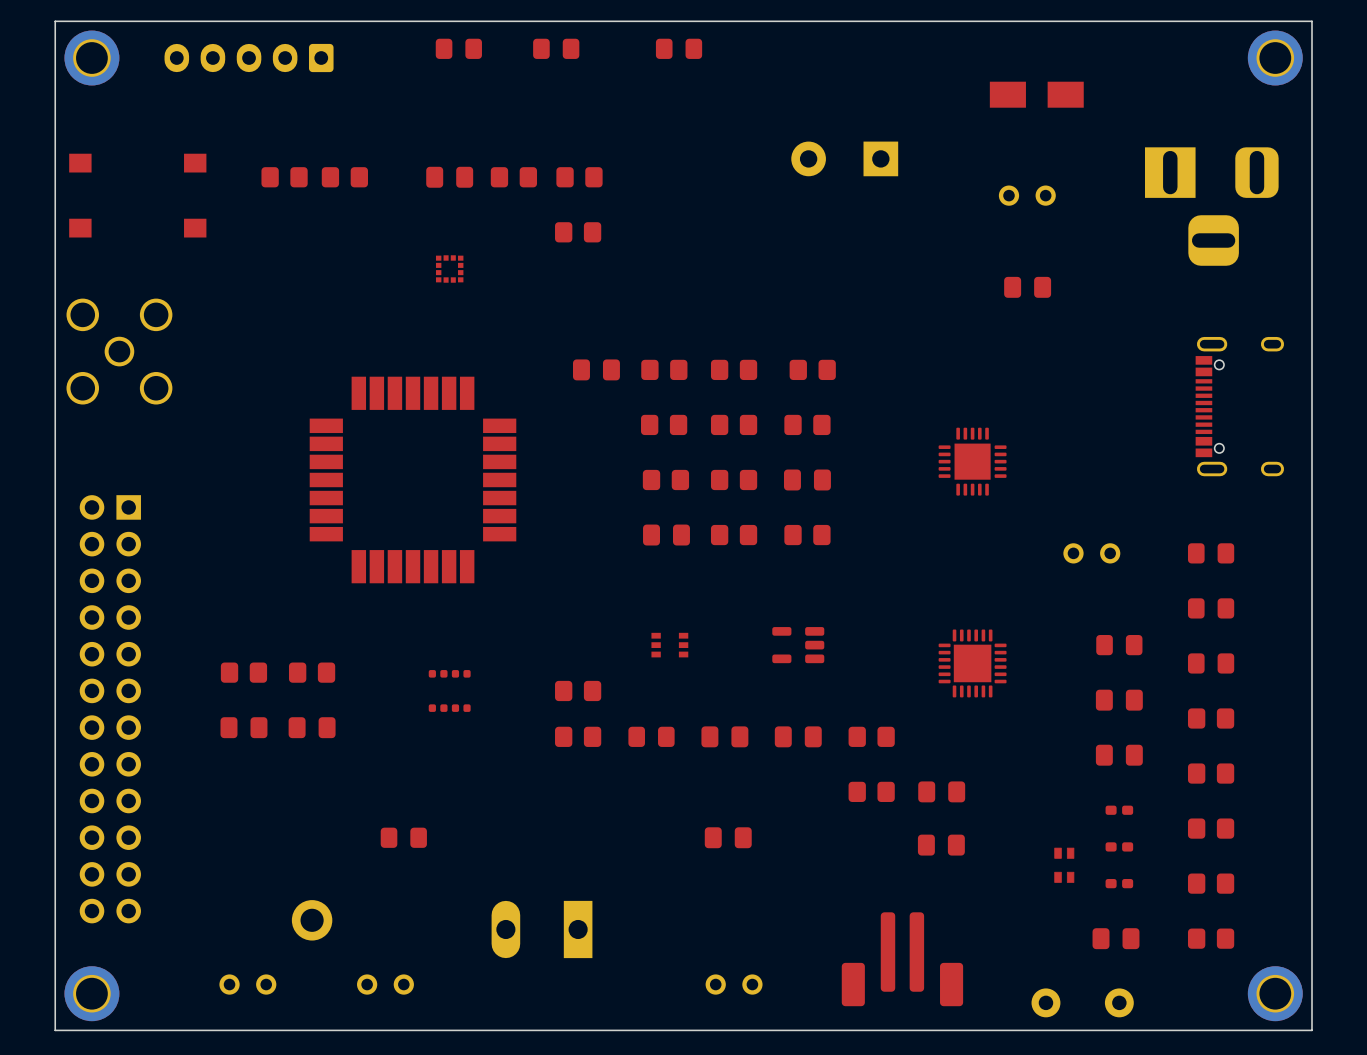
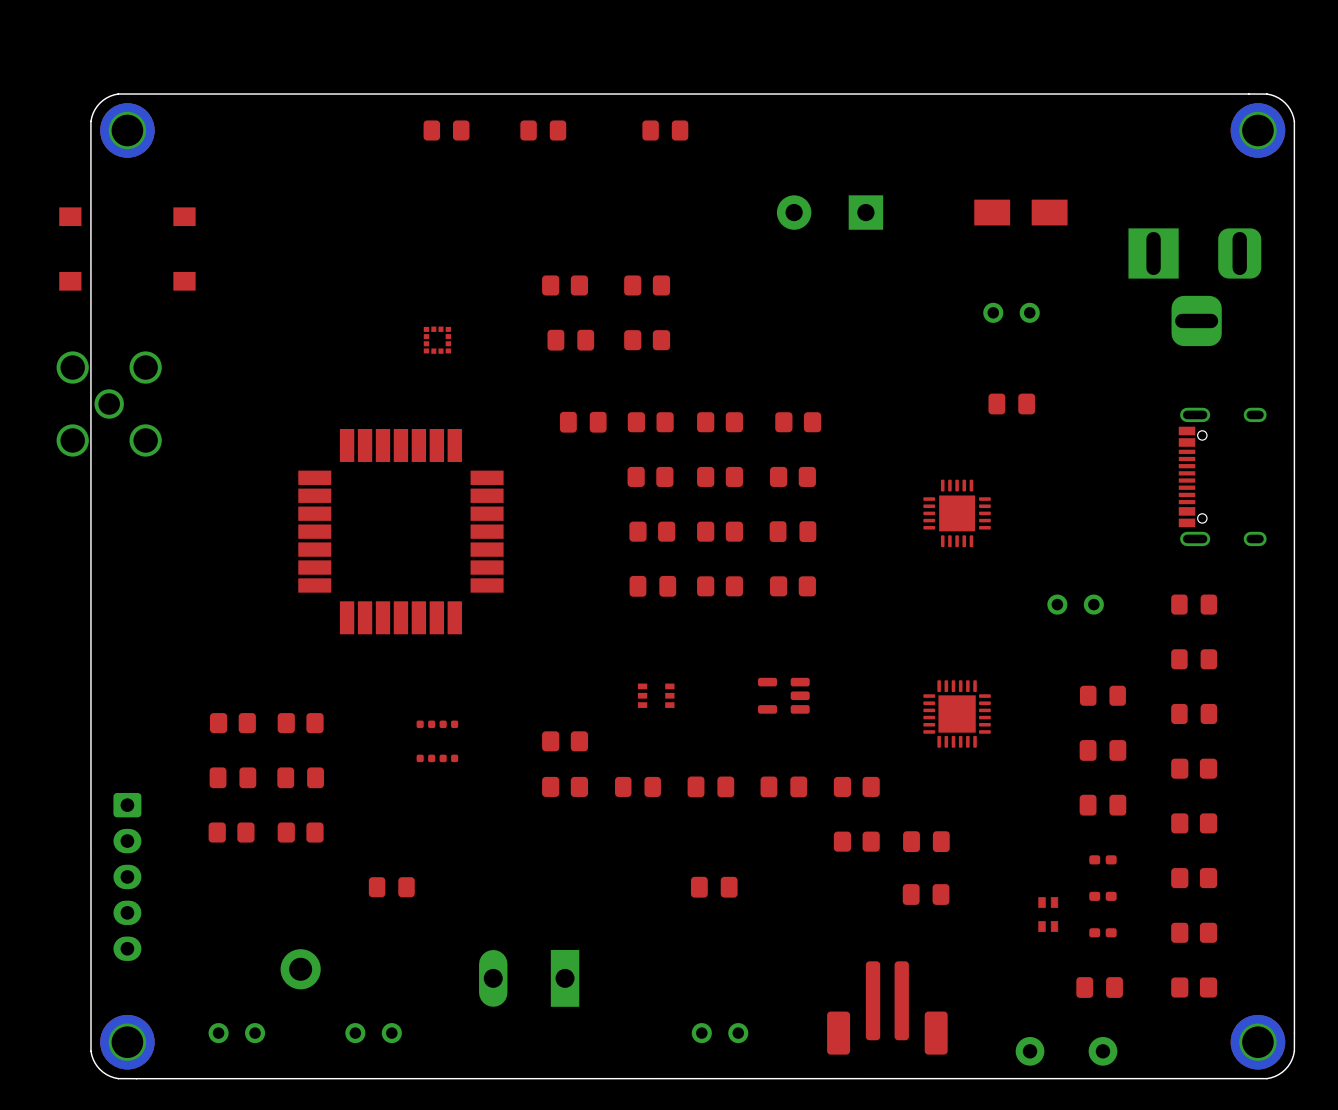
board edge: (1312, 21) (55, 21) (55, 1030) (1312, 1030) (1312, 21) -> (1267, 94) (1275, 96) (1285, 103) (1292, 113) (1294, 121) (1294, 1051) (1290, 1062) (1282, 1072) (1267, 1078) (118, 1078) (106, 1074) (97, 1066) (91, 1051) (90, 121) (94, 109) (103, 100) (118, 94) (1267, 94)
part position: (458, 48) -> (446, 130)
part position: (556, 48) -> (543, 130)
part position: (679, 48) -> (665, 130)
part position: (91, 58) -> (127, 130)
part: (249, 58) -> none
part position: (1275, 58) -> (1257, 130)
part position: (1036, 94) -> (1020, 212)
part: (284, 177) -> none
part: (344, 177) -> none
part position: (449, 177) -> (570, 340)
part: (513, 177) -> none
part: (579, 177) -> none
part position: (1027, 195) -> (1011, 312)
part position: (1211, 206) -> (1194, 287)
part: none -> (647, 285)
part position: (449, 269) -> (437, 340)
part: none -> (647, 340)
part position: (1027, 287) -> (1011, 404)
part position: (1239, 406) -> (1222, 476)
part: (110, 709) -> none
part: none -> (231, 832)
part: none -> (300, 832)
part: none -> (127, 876)
part position: (91, 993) -> (127, 1042)

